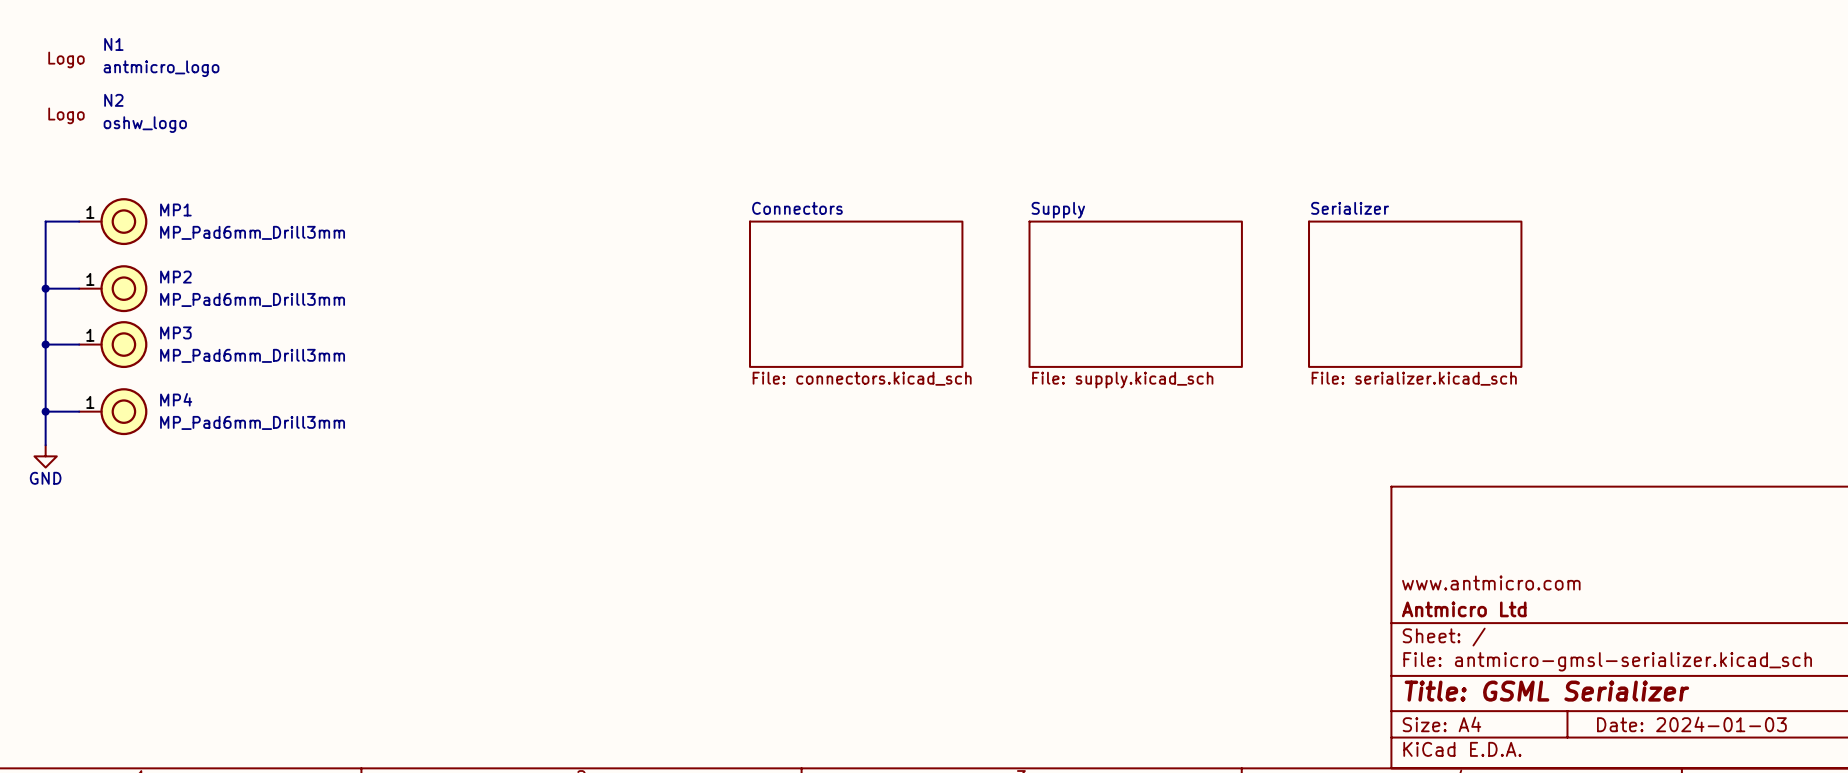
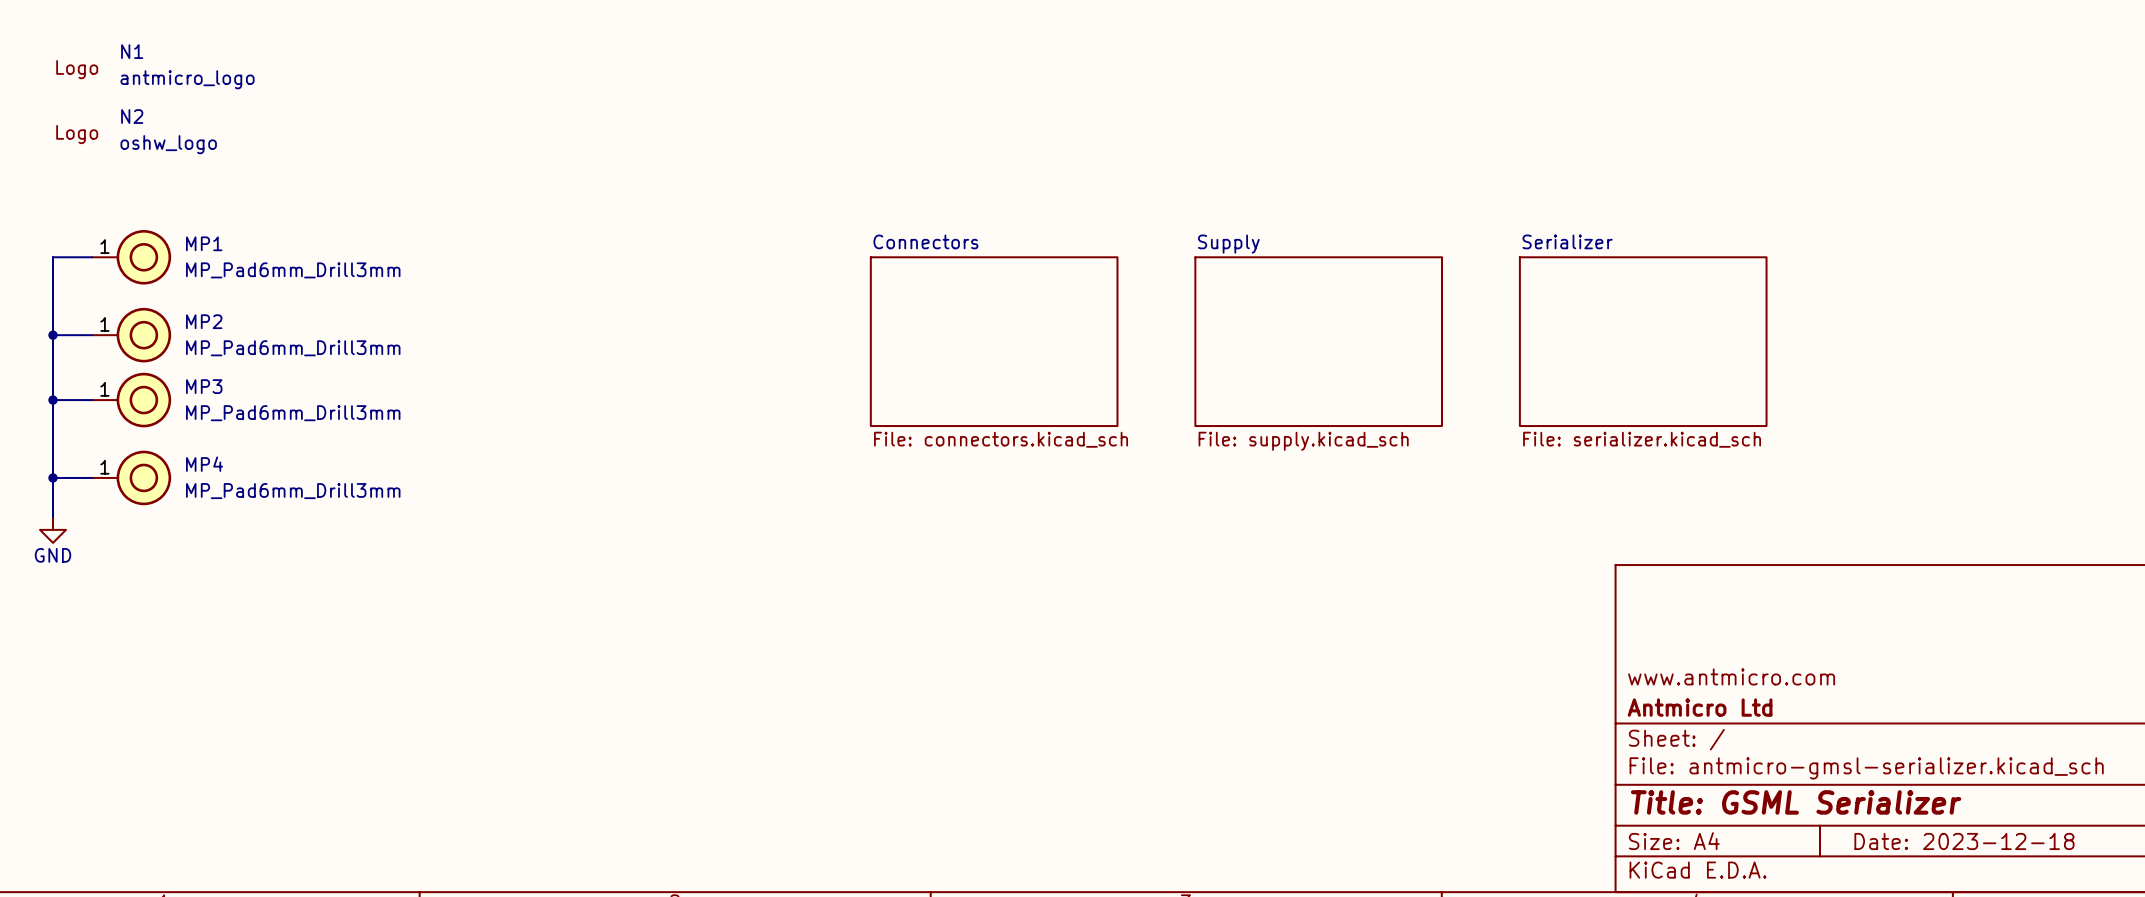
title block: Date: 2024-01-03 (1691, 724) -> Date: 2023-12-18 (1964, 841)

